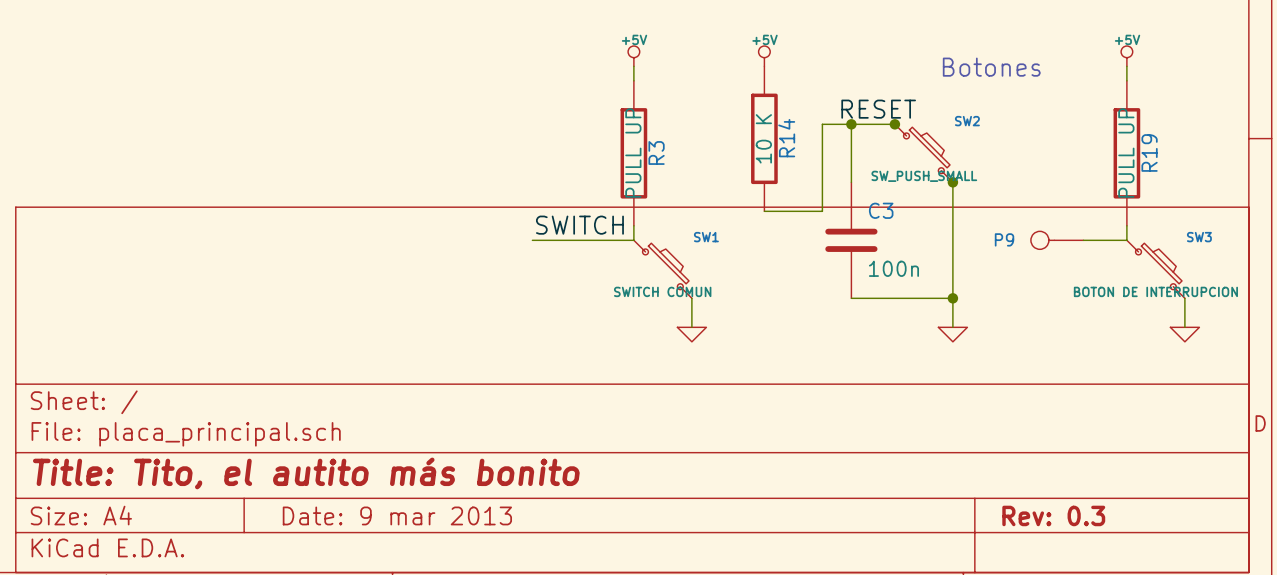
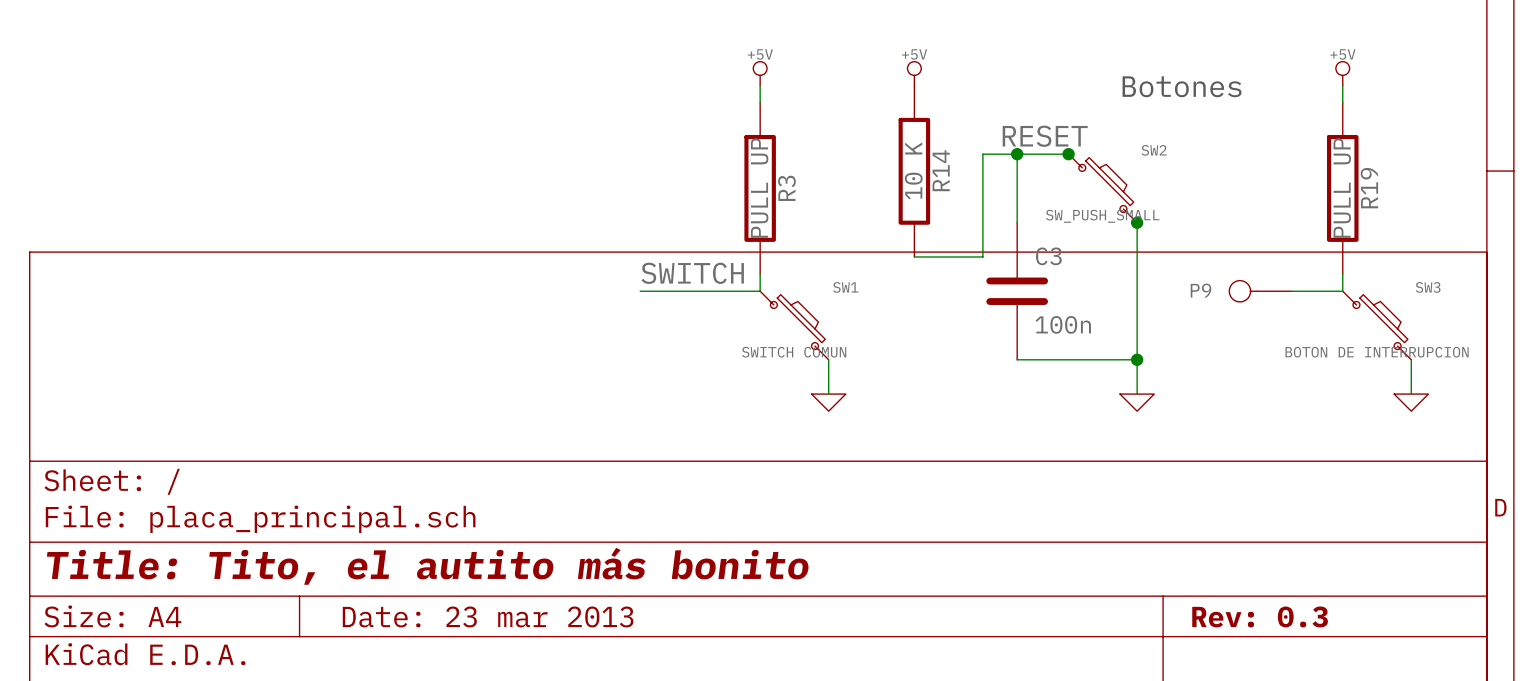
title block: Date: 9 mar 2013 (397, 515) -> Date: 23 mar 2013 (488, 616)

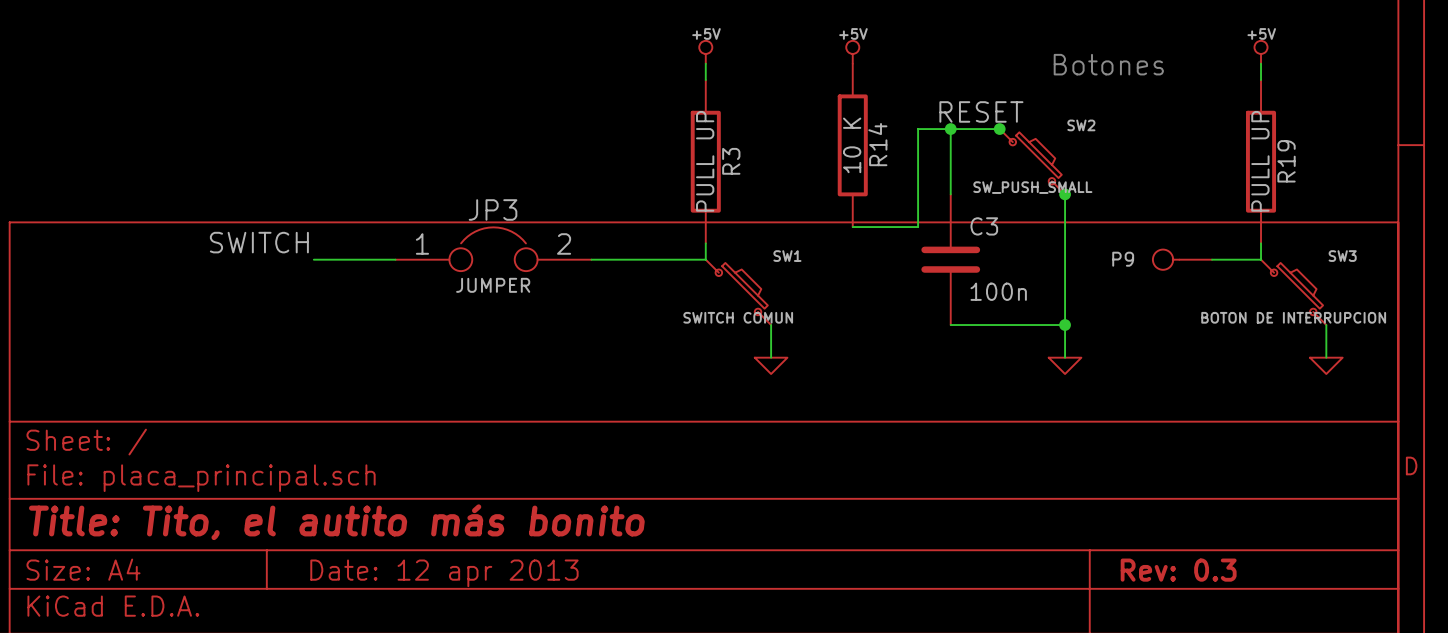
label position: SWITCH (692, 273) -> SWITCH (259, 242)
JP3: none -> JUMPER (493, 249)
wire: none -> (313, 259) (395, 259)
title block: Date: 23 mar 2013 (488, 616) -> Date: 12 apr 2013 (444, 573)

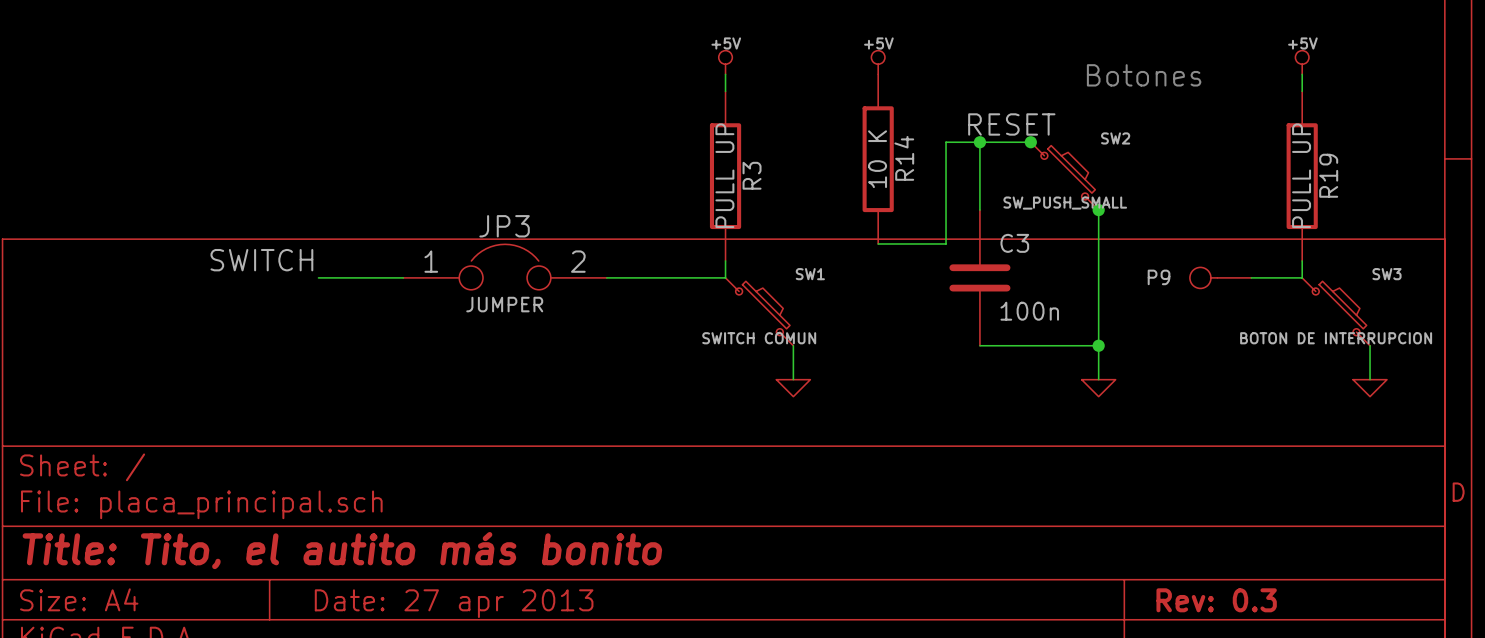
title block: Date: 12 apr 2013 (444, 573) -> Date: 27 apr 2013 (454, 603)

